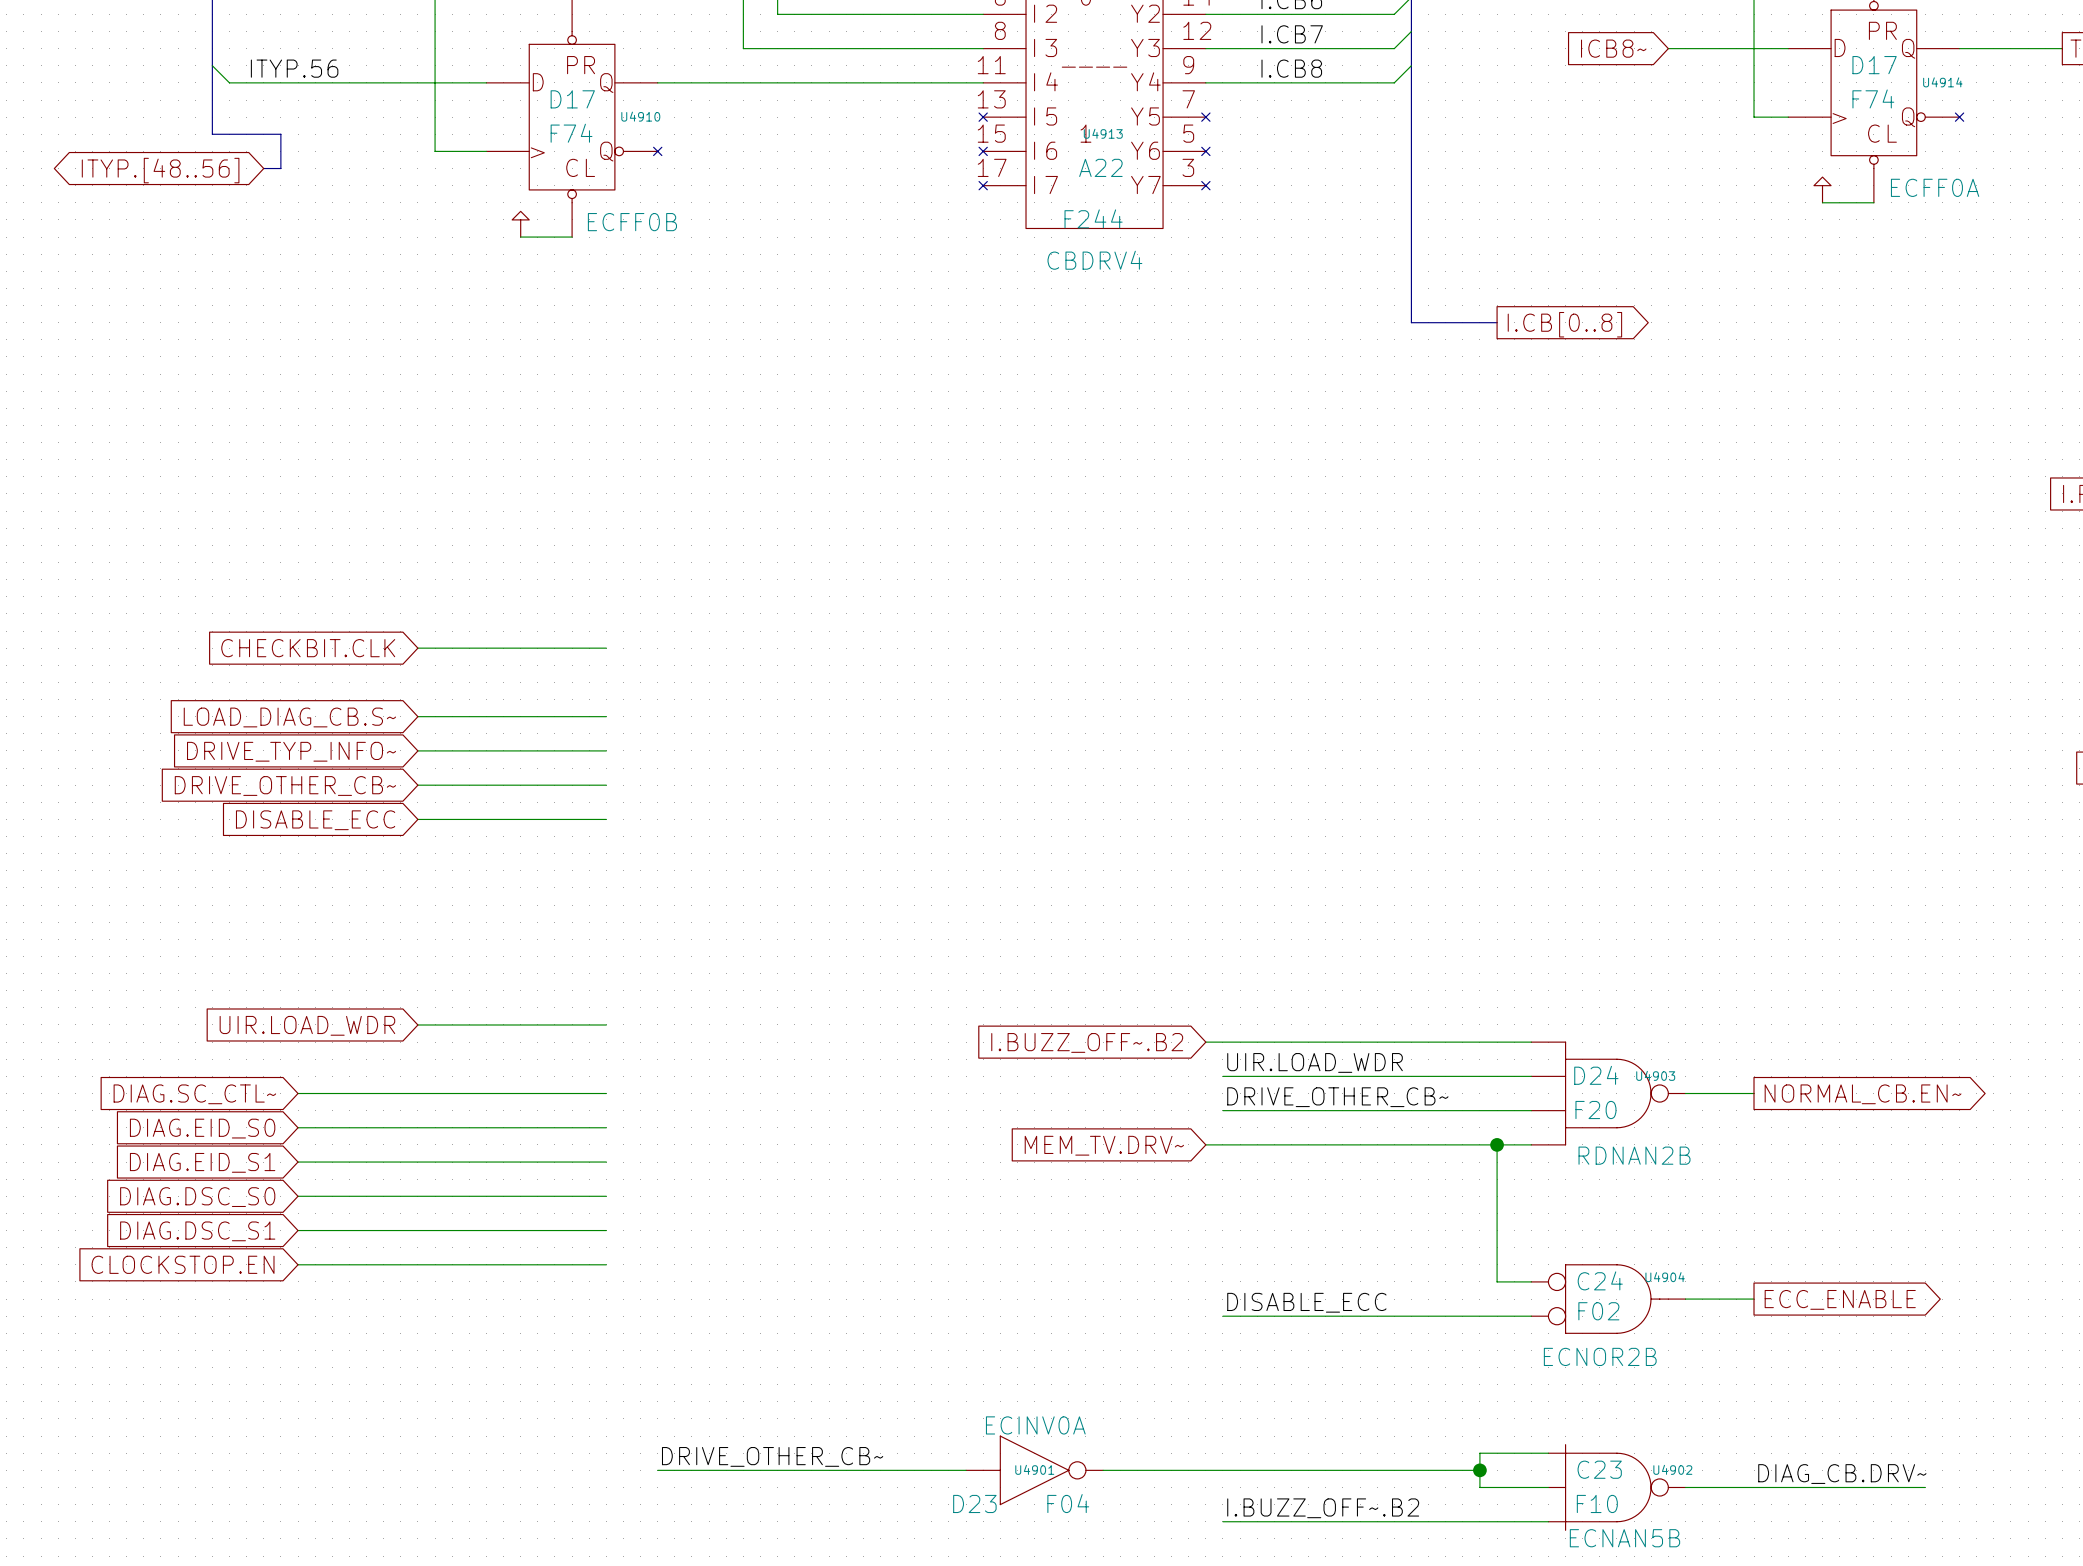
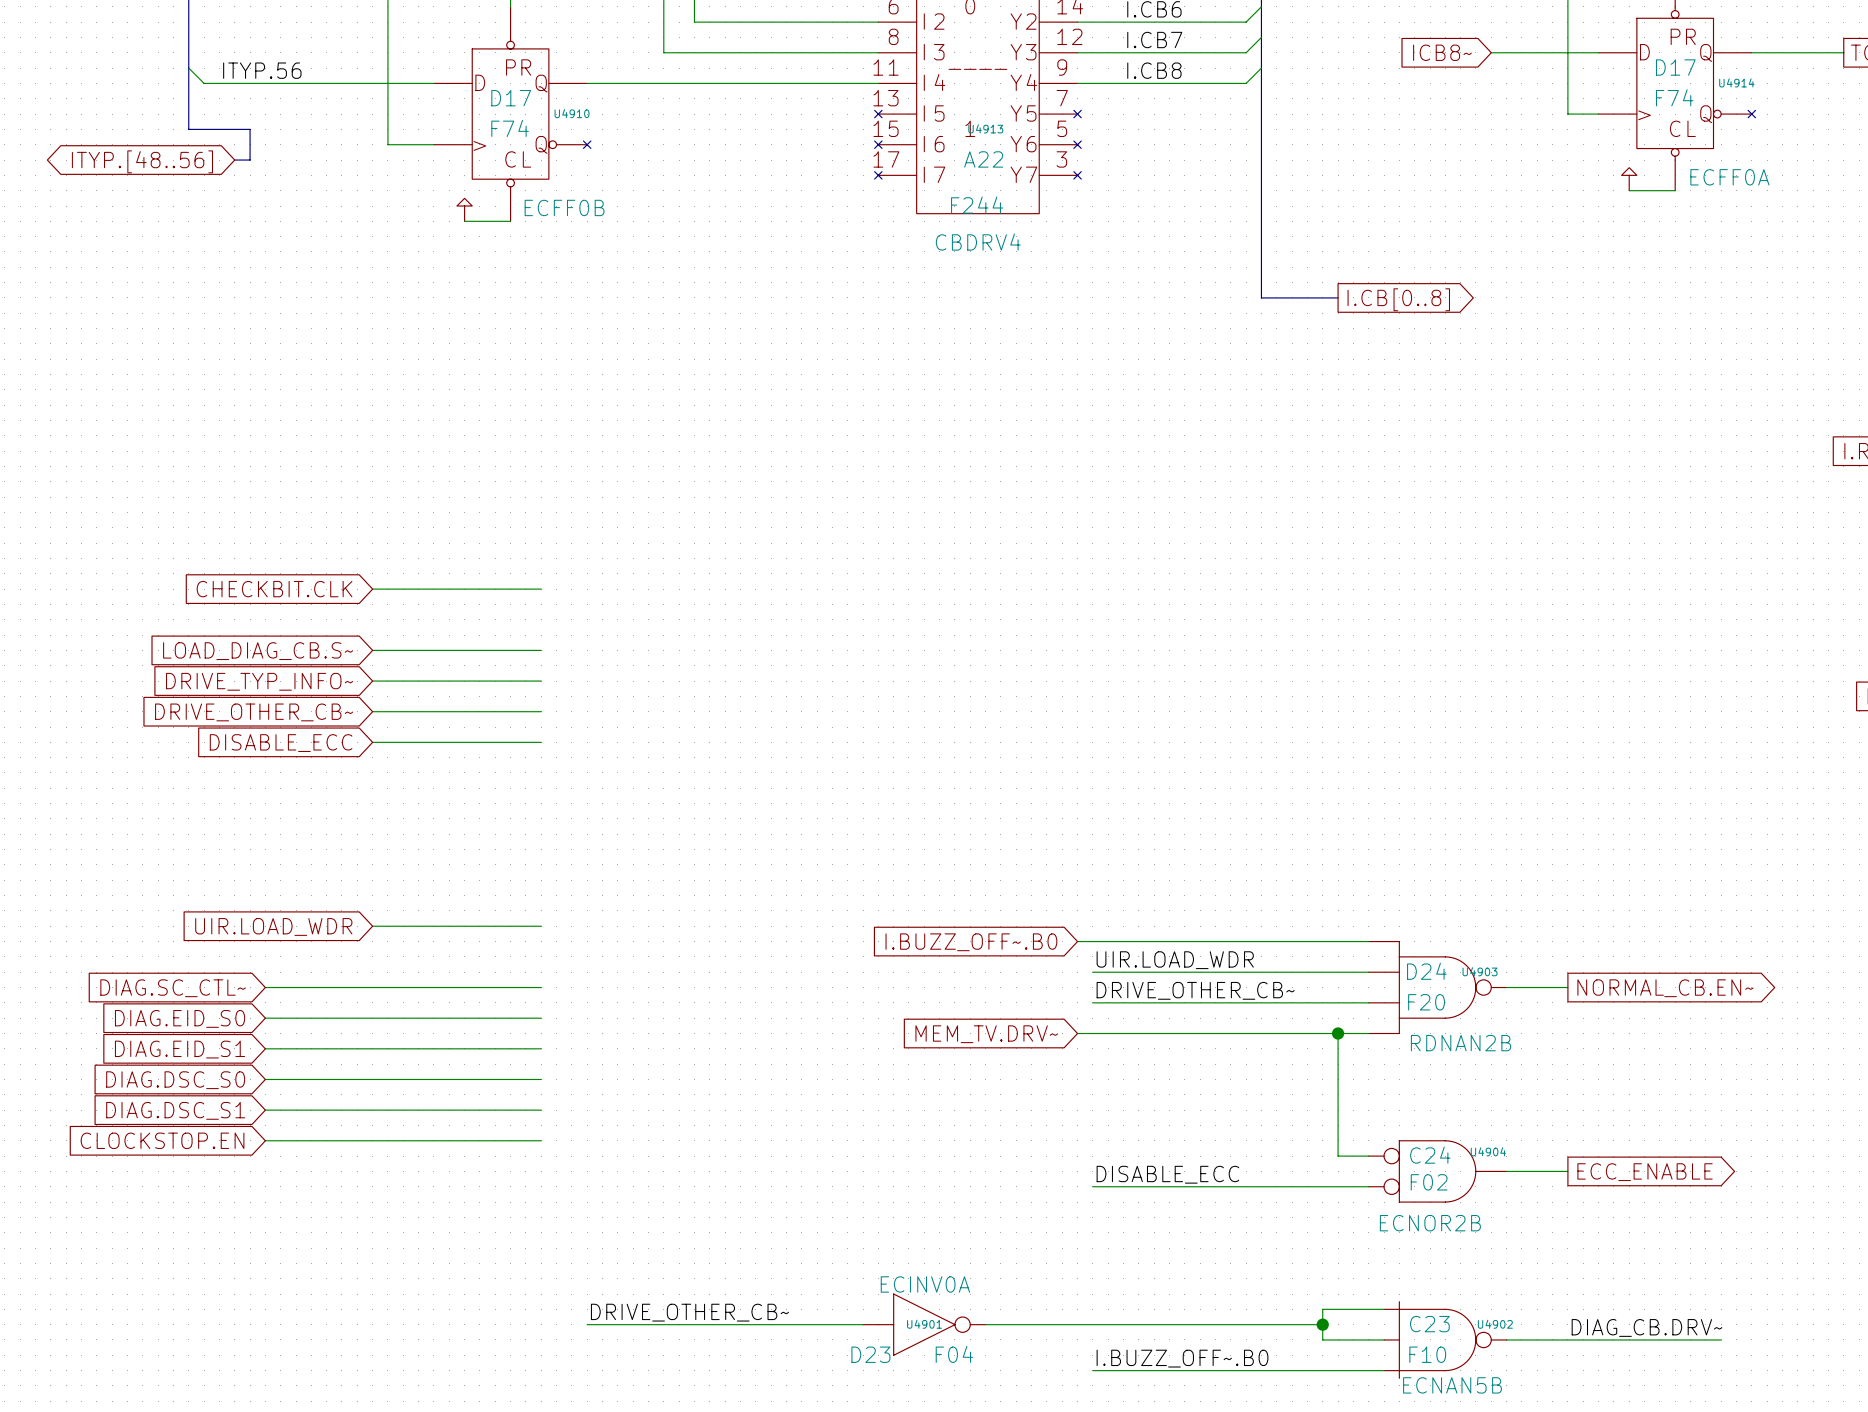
global label: I.BUZZ_OFF~.B2 (1087, 1042) -> I.BUZZ_OFF~.B0 (971, 942)
label: I.BUZZ_OFF~.B2 (1323, 1508) -> I.BUZZ_OFF~.B0 (1182, 1358)

